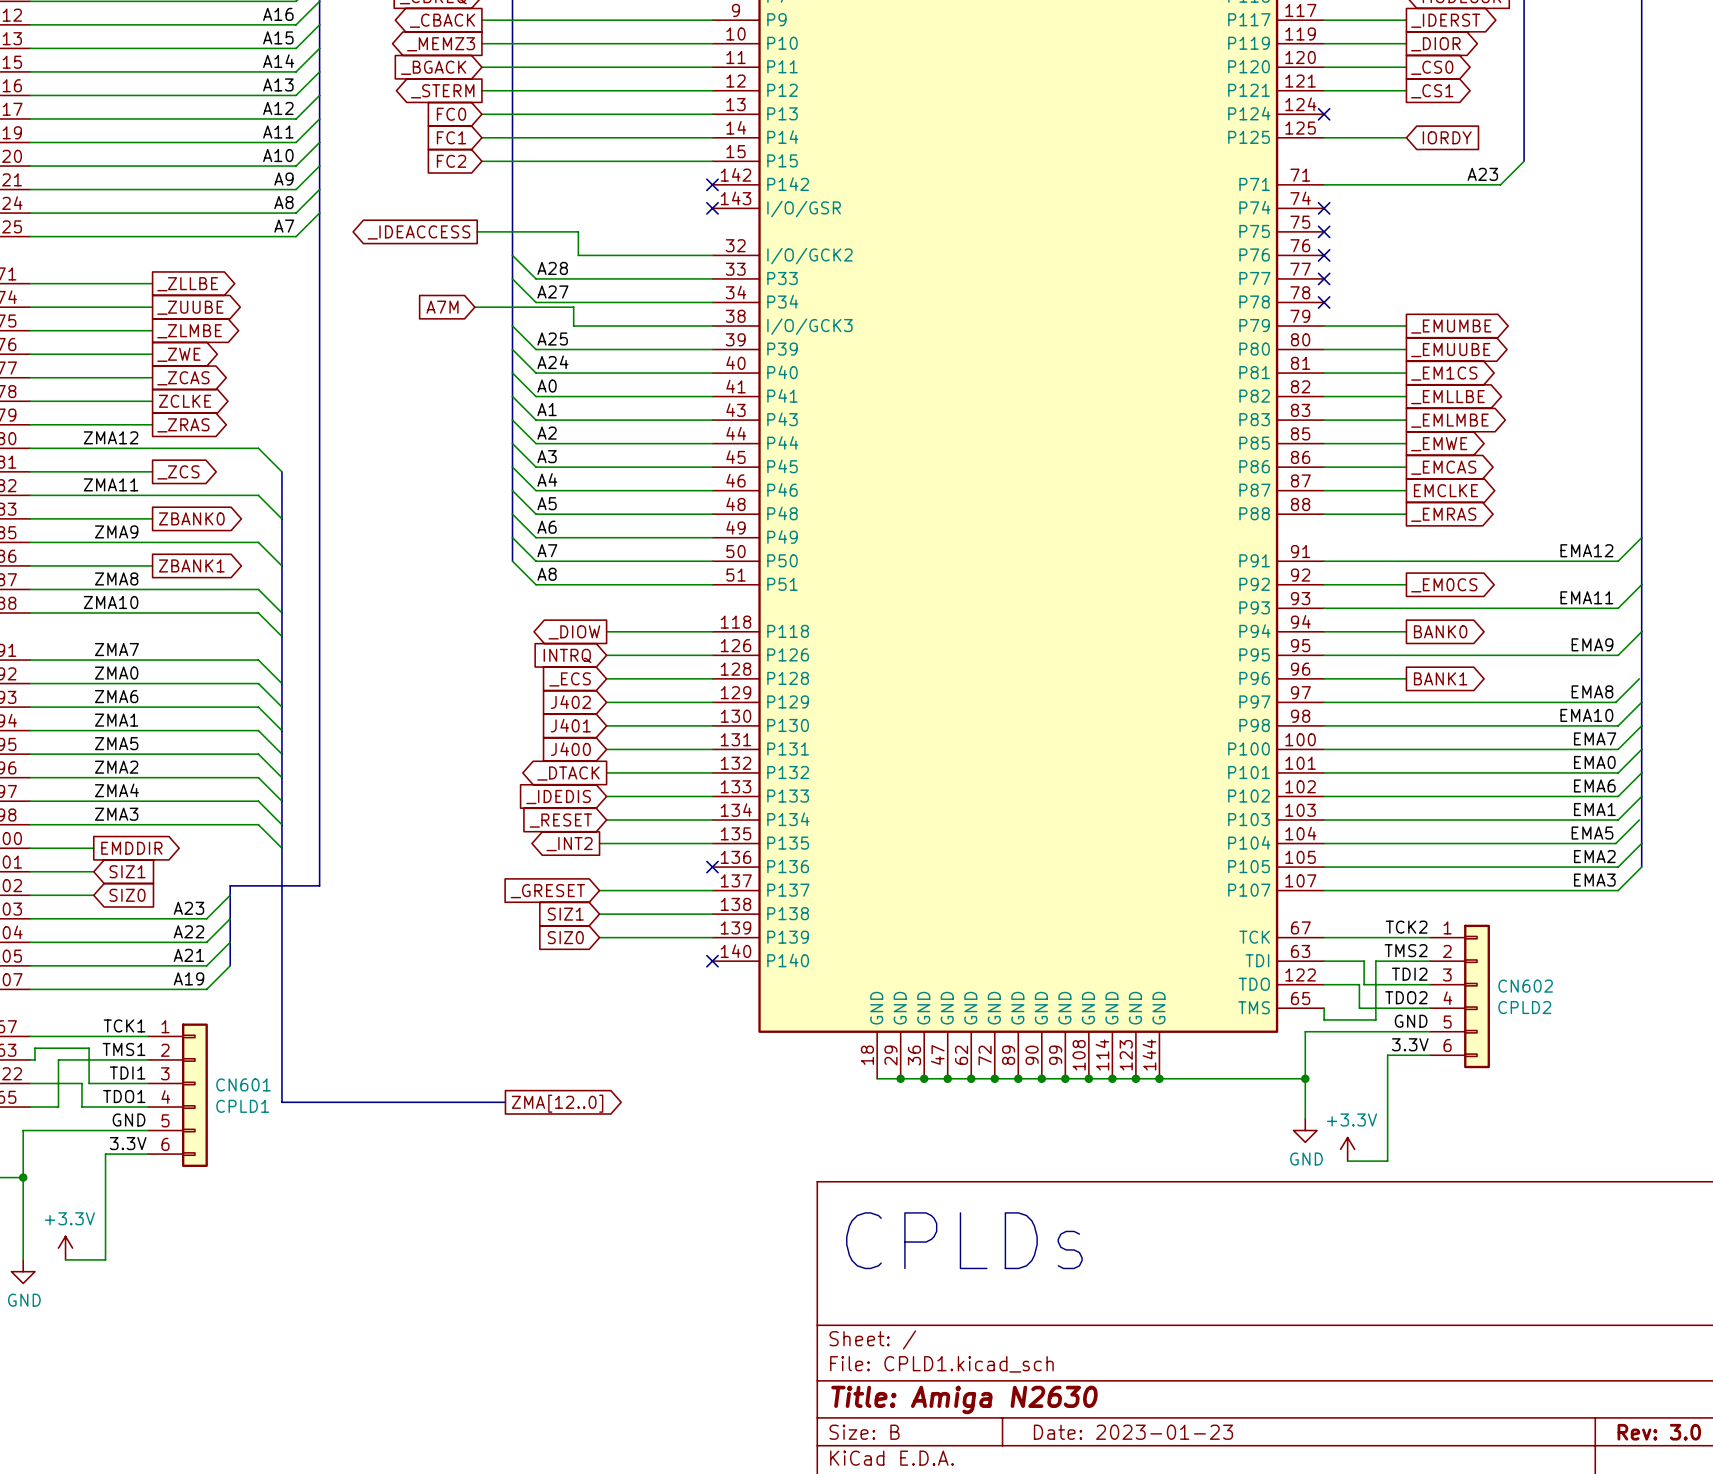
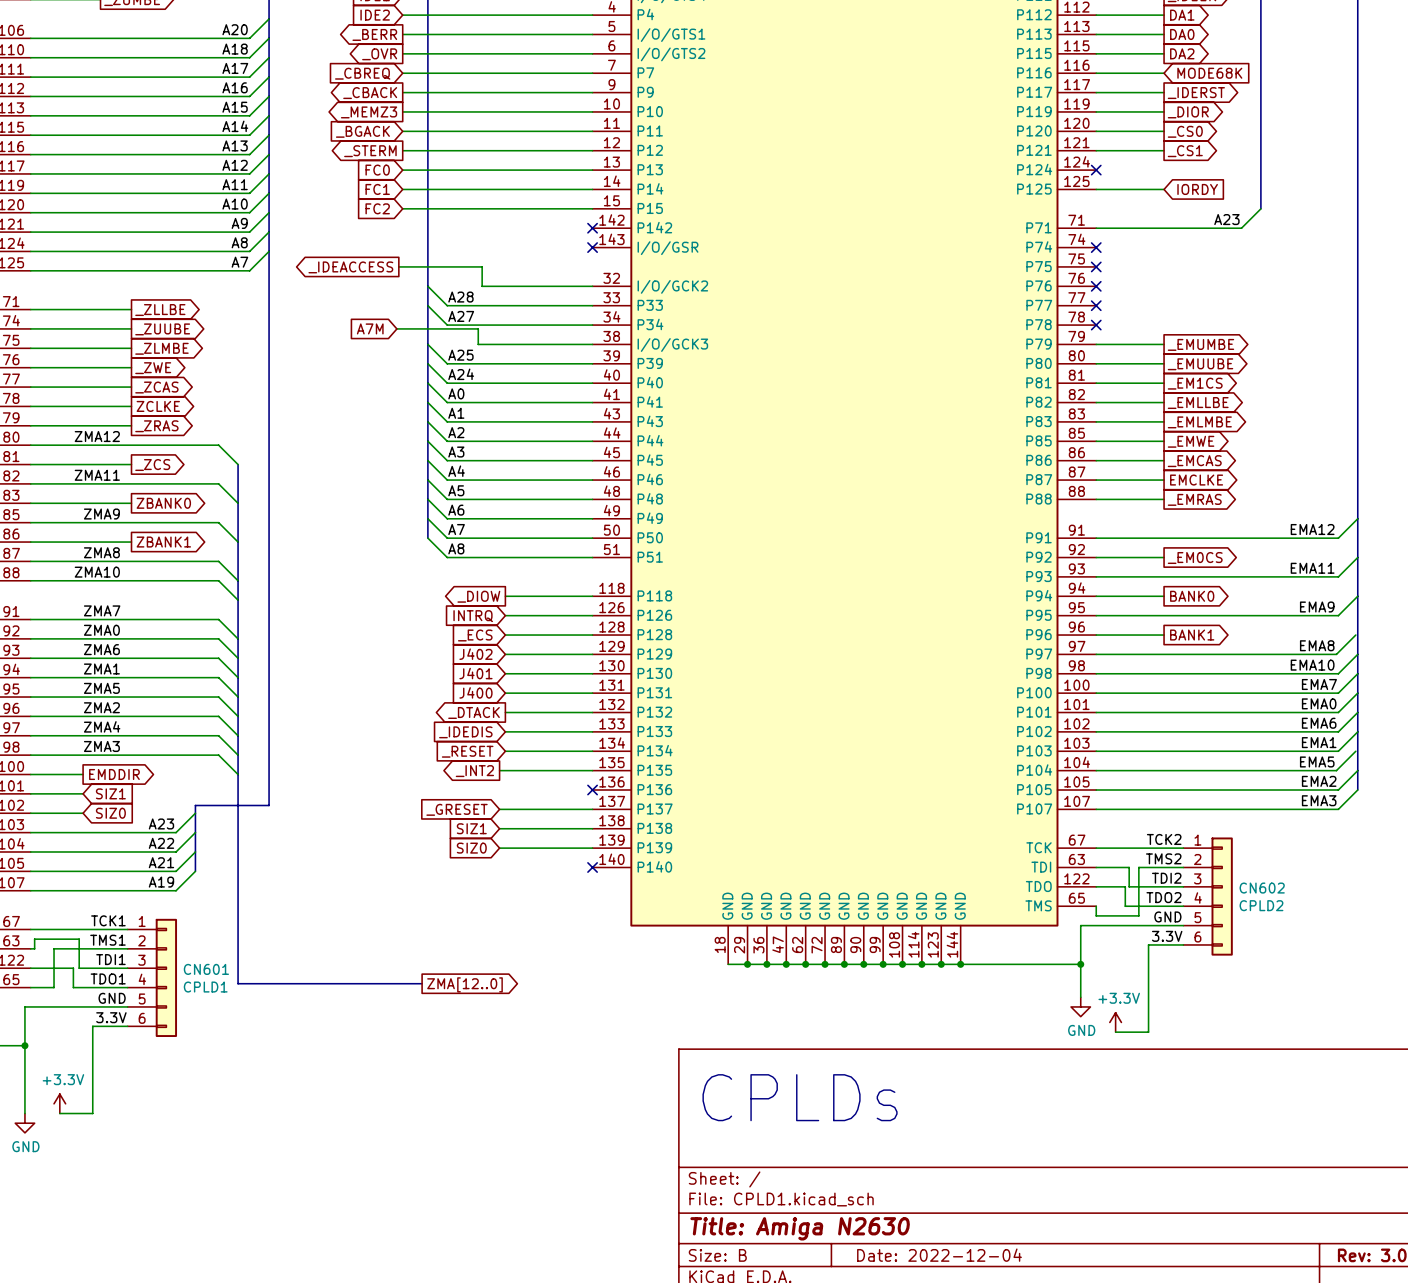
title block: Date: 2023-01-23 (1133, 1432) -> Date: 2022-12-04 (939, 1255)

